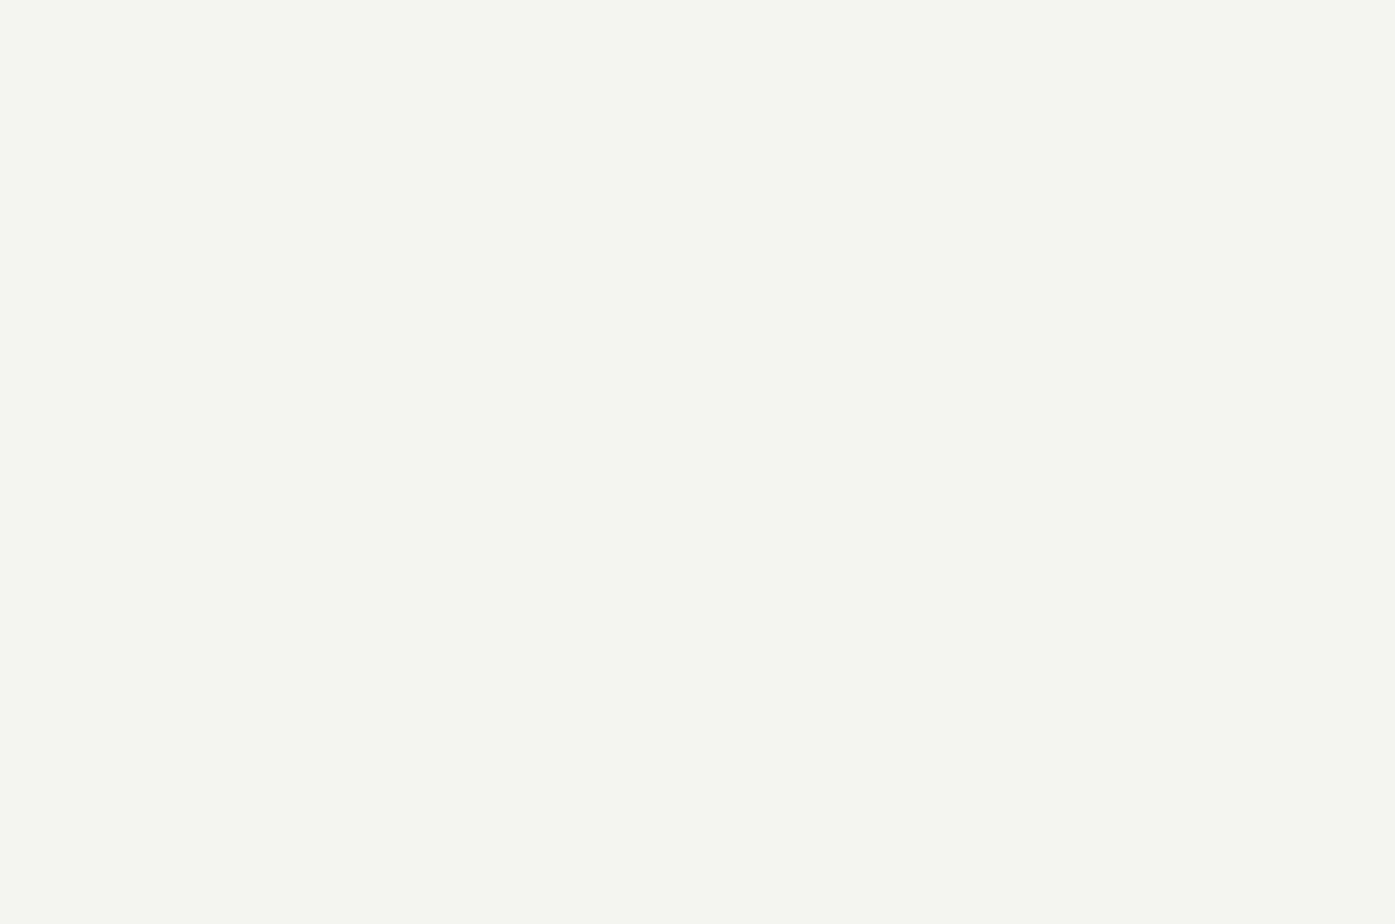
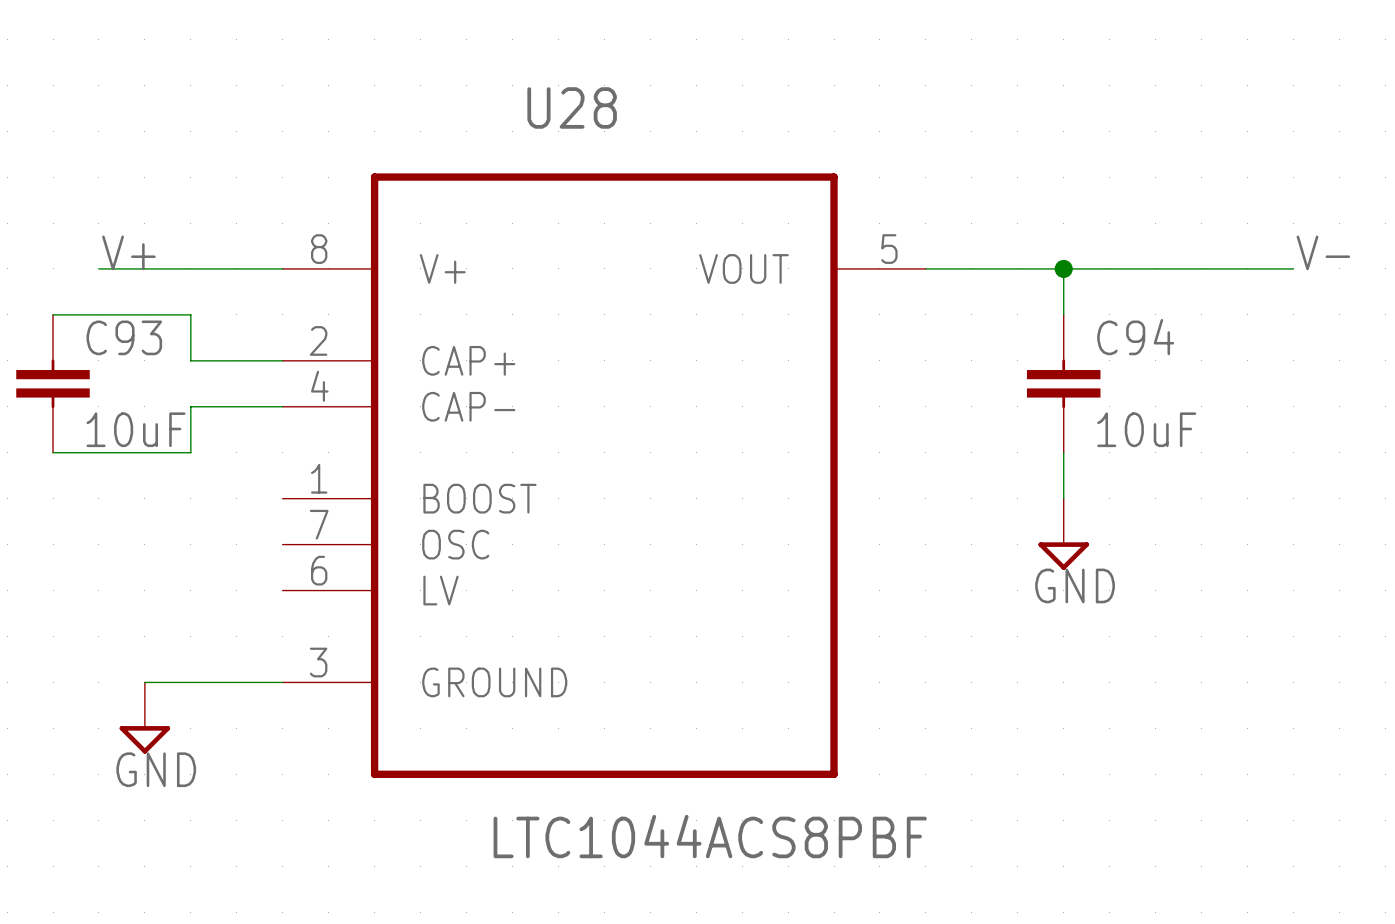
label: none -> V+ (128, 252)
label: none -> V- (1323, 252)
wire: none -> (98, 268) (282, 268)
wire: none -> (925, 268) (1293, 268)
wire: none -> (1063, 268) (1063, 314)
junction: none -> (1063, 268)
wire: none -> (53, 314) (190, 314) (190, 360) (282, 360)
C93: none -> 10uF (53, 383)
C94: none -> 10uF (1063, 383)
wire: none -> (282, 406) (190, 406) (190, 452) (53, 452)
wire: none -> (1063, 452) (1063, 498)
U28: none -> LTC1044ACS8PBF (604, 475)
power symbol: none -> GND (1063, 534)
wire: none -> (144, 682) (282, 682)
power symbol: none -> GND (144, 718)

